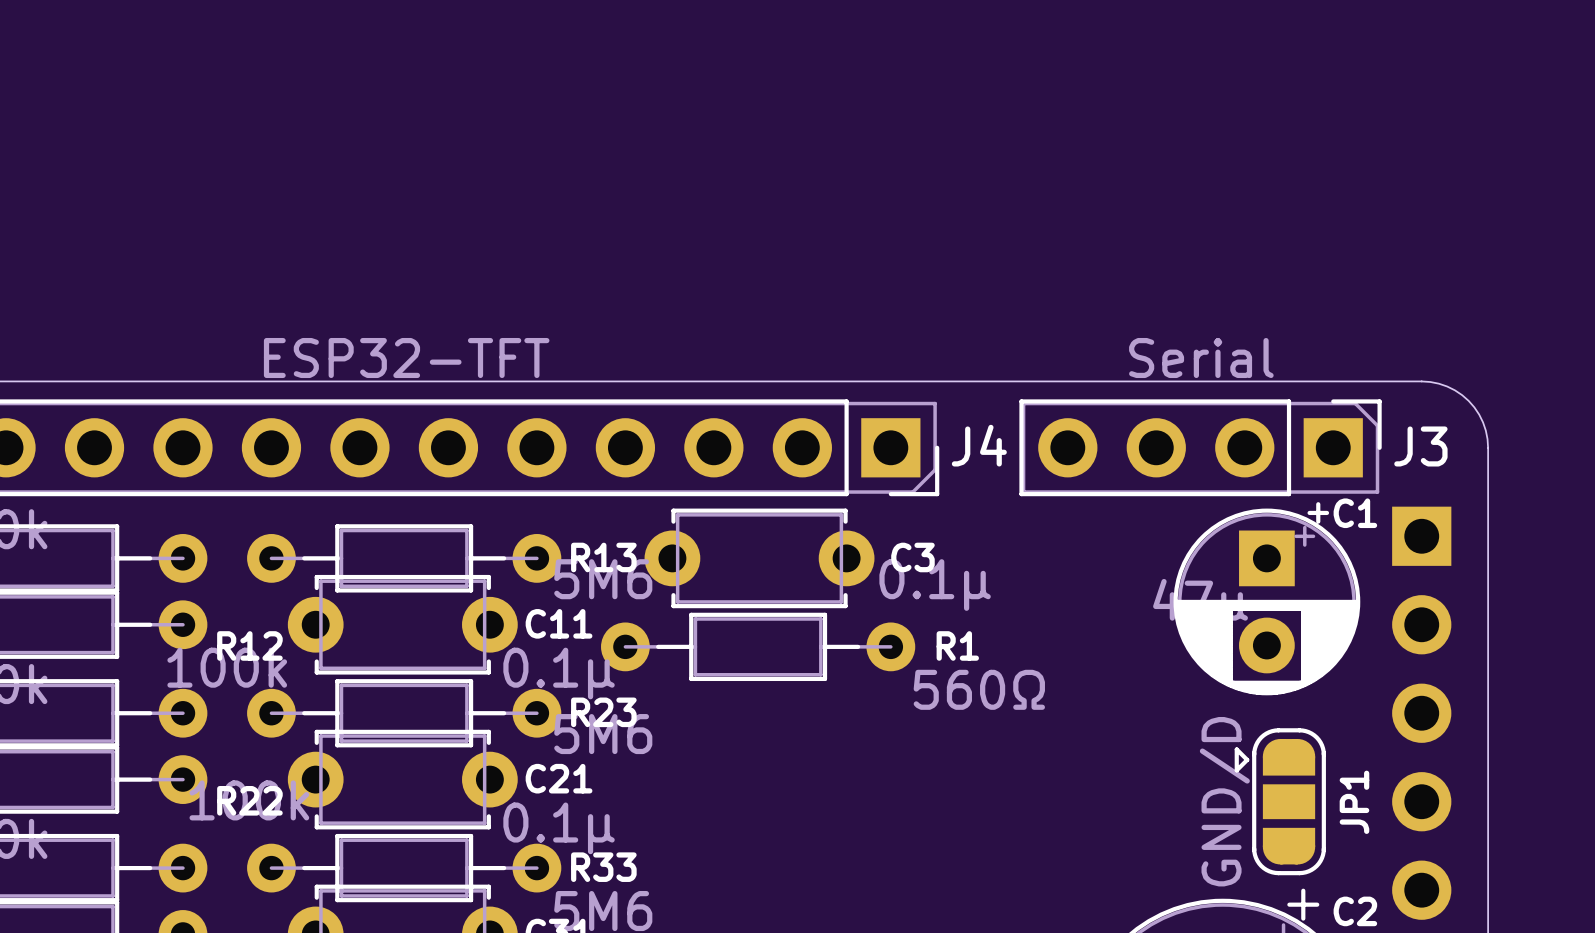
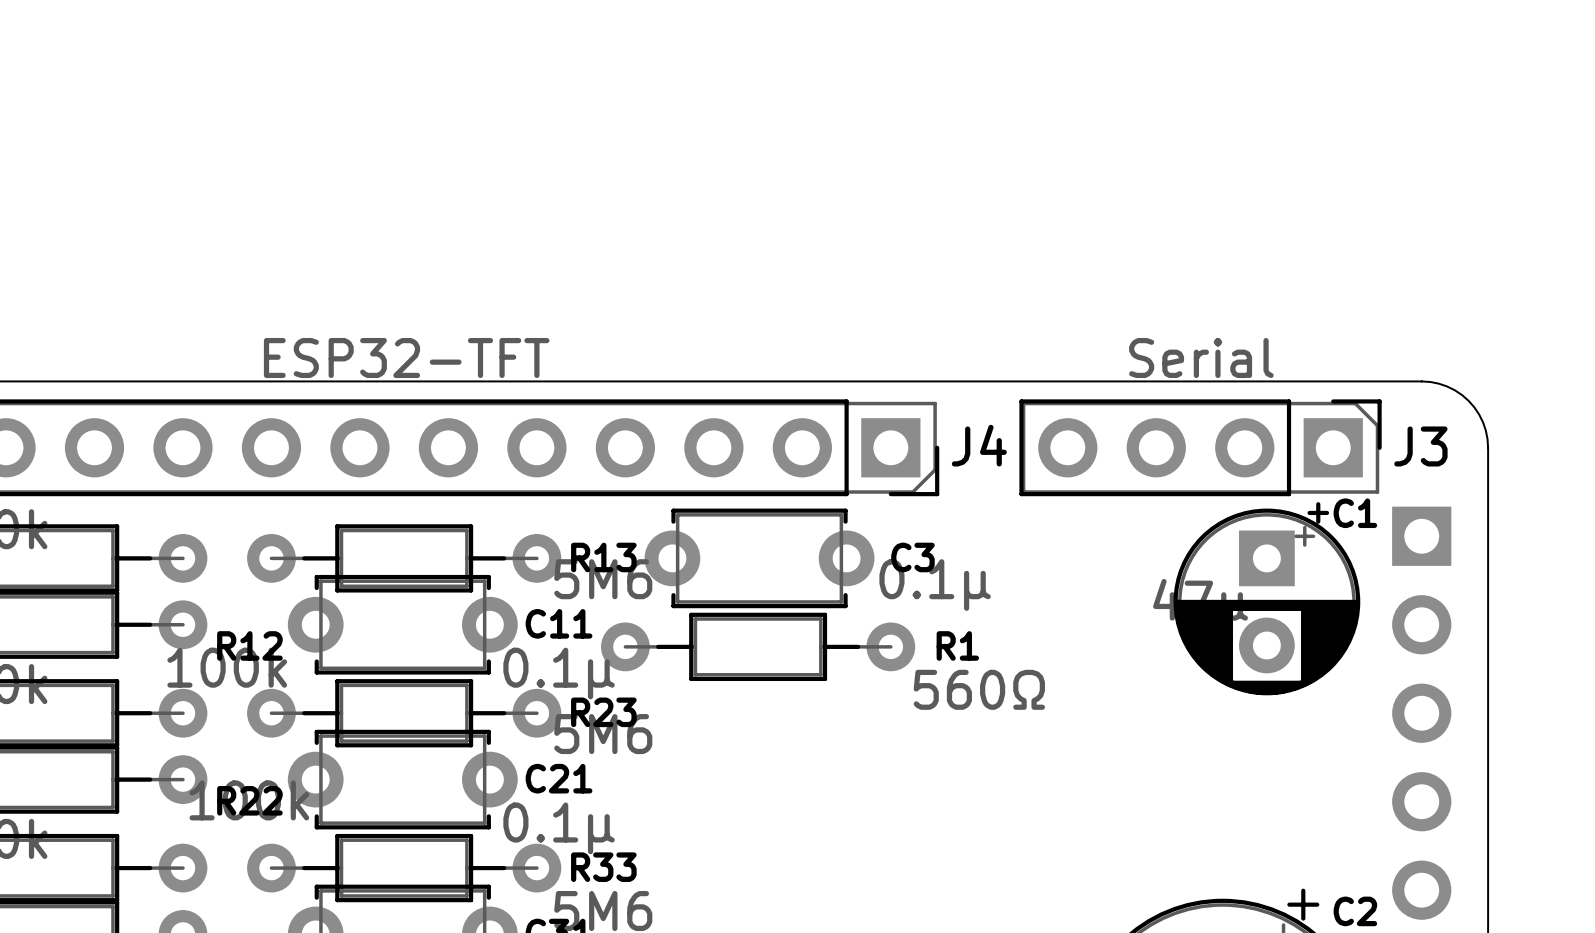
JP1: GND/D (1280, 801) -> none

